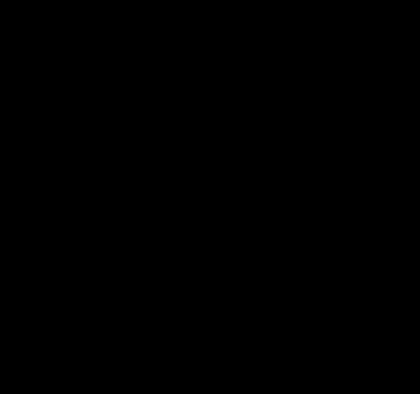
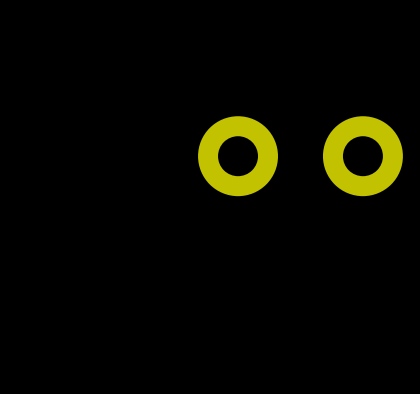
part: none -> (300, 156)

